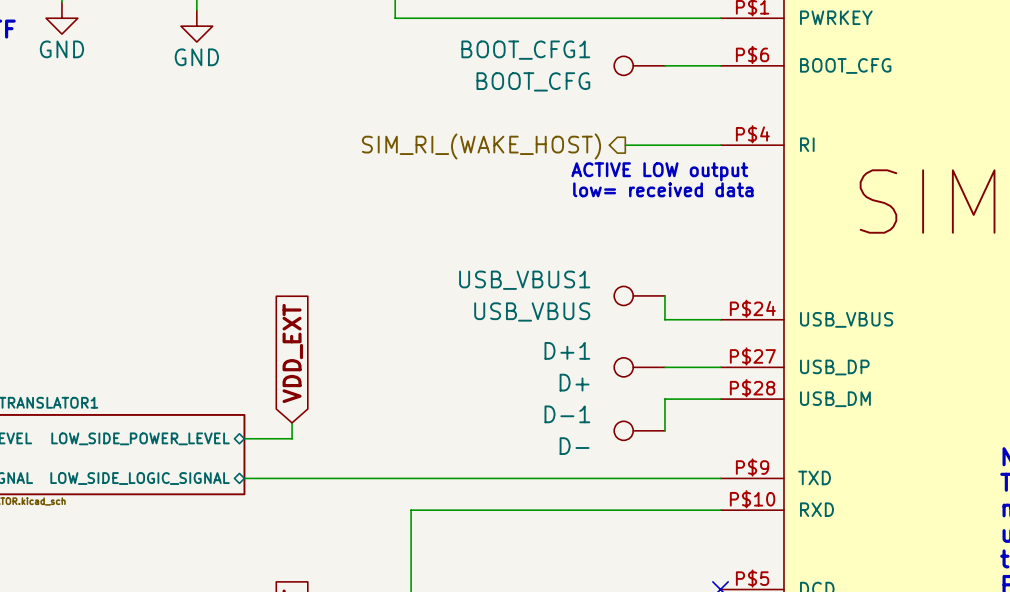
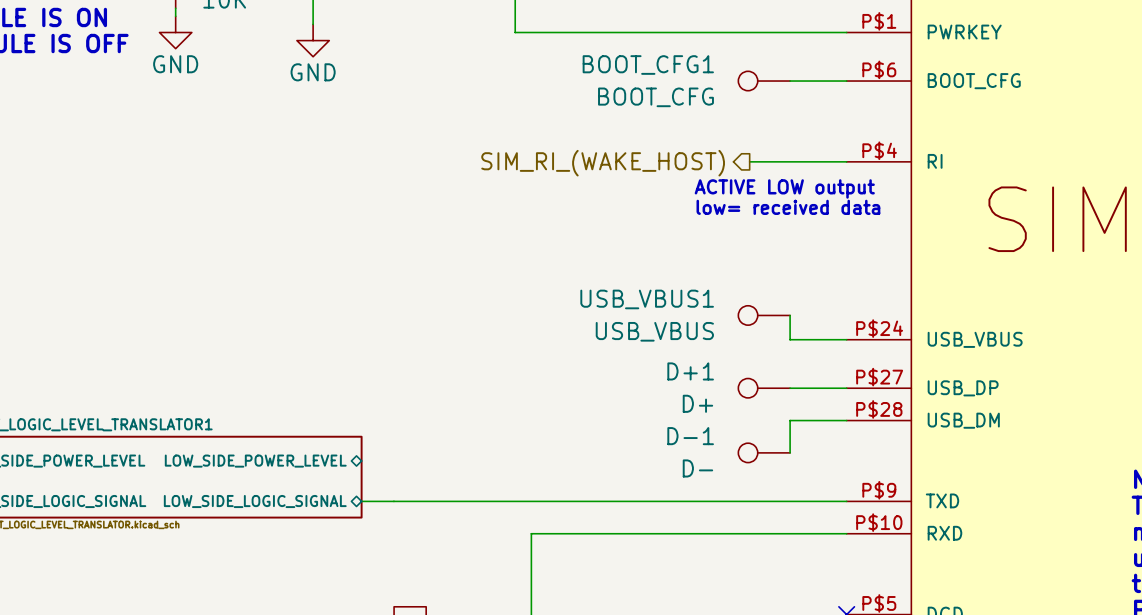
global label: VDD_EXT (292, 353) -> none
wire: (292, 422) (292, 438) (244, 438) -> none

